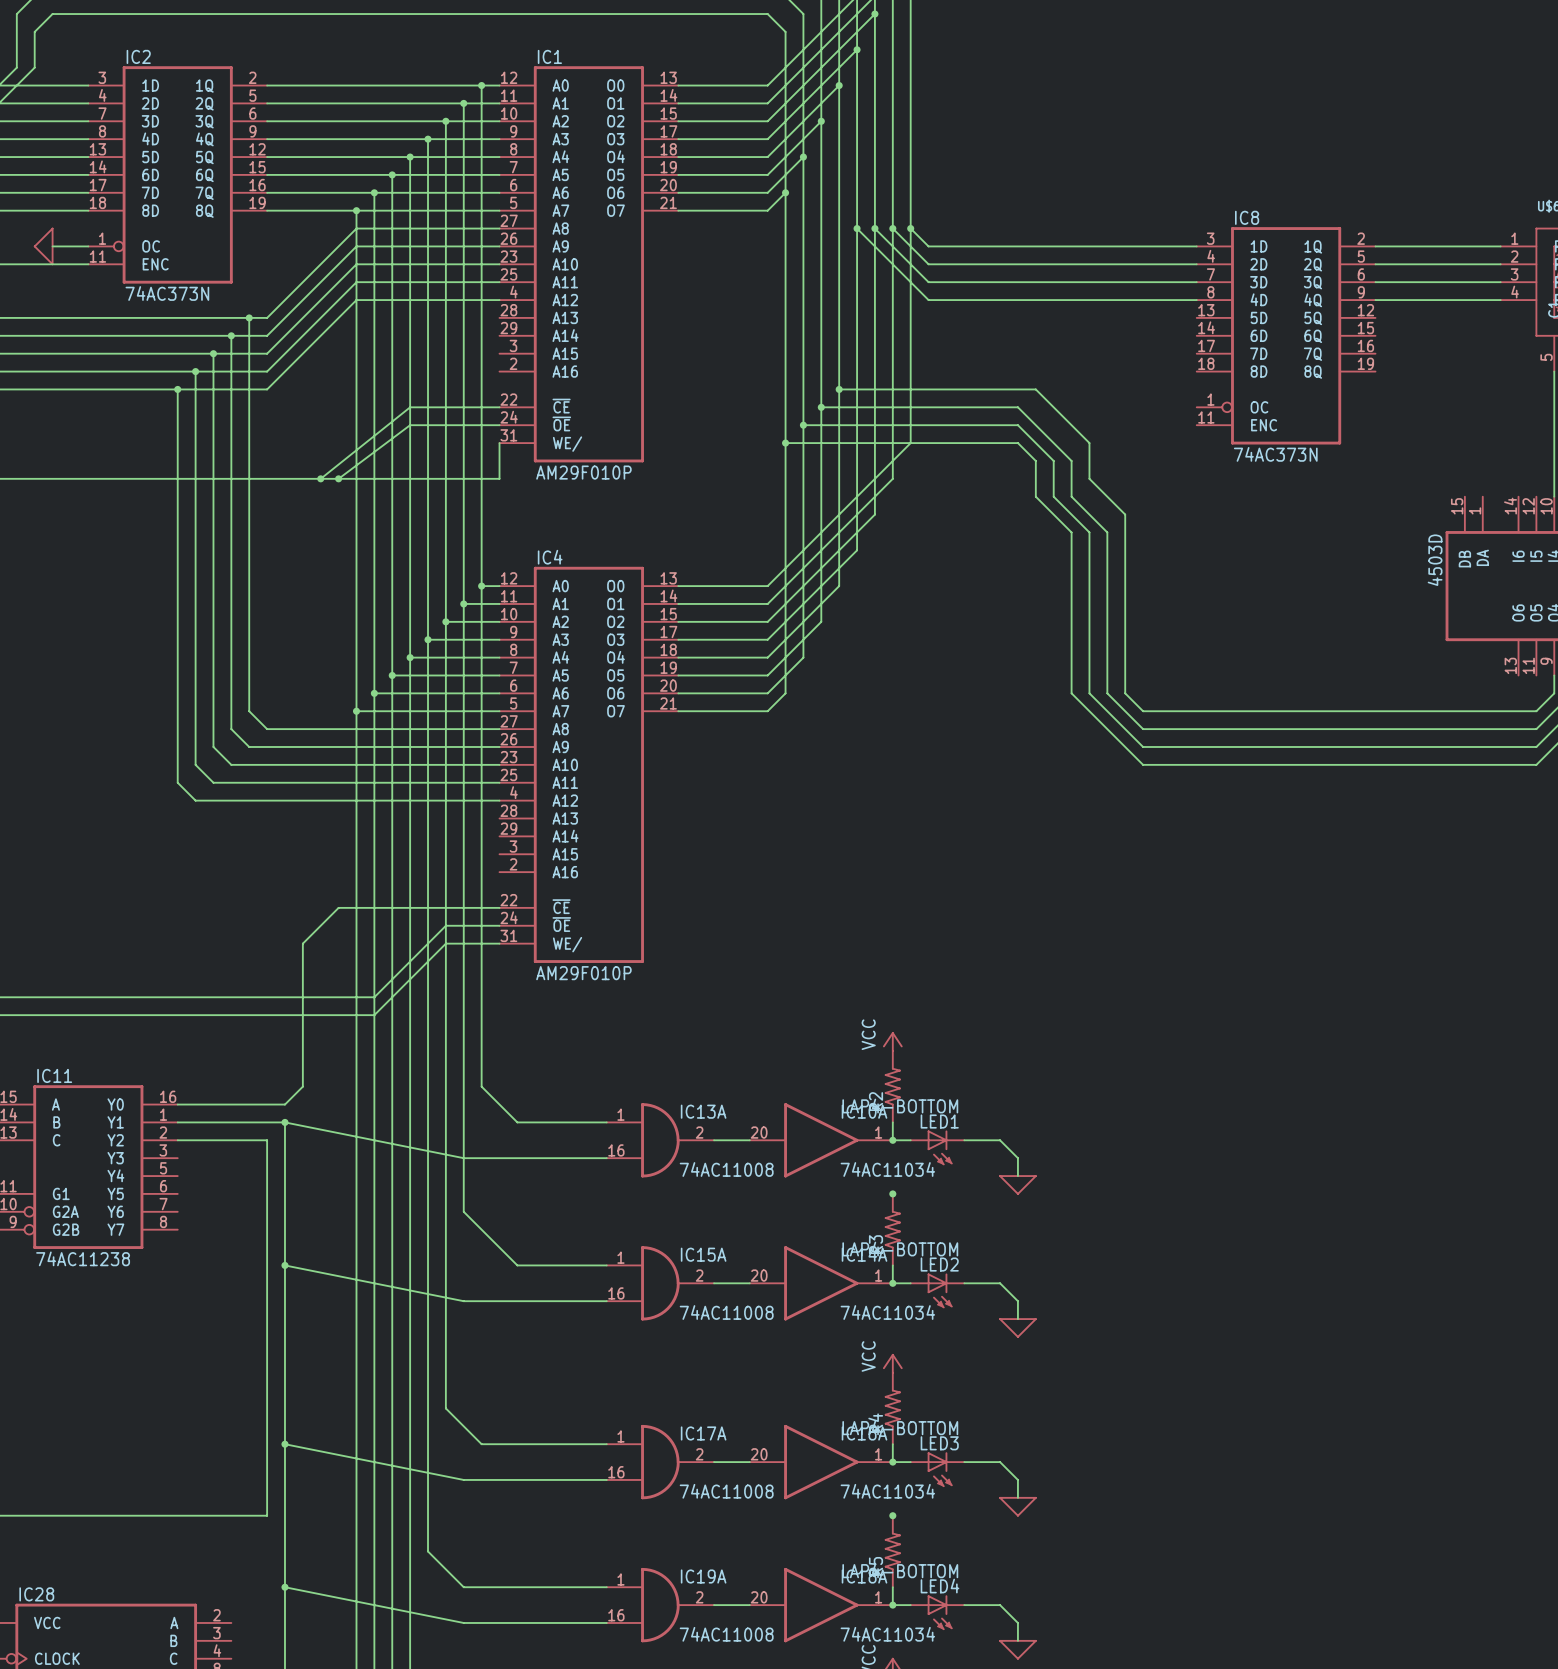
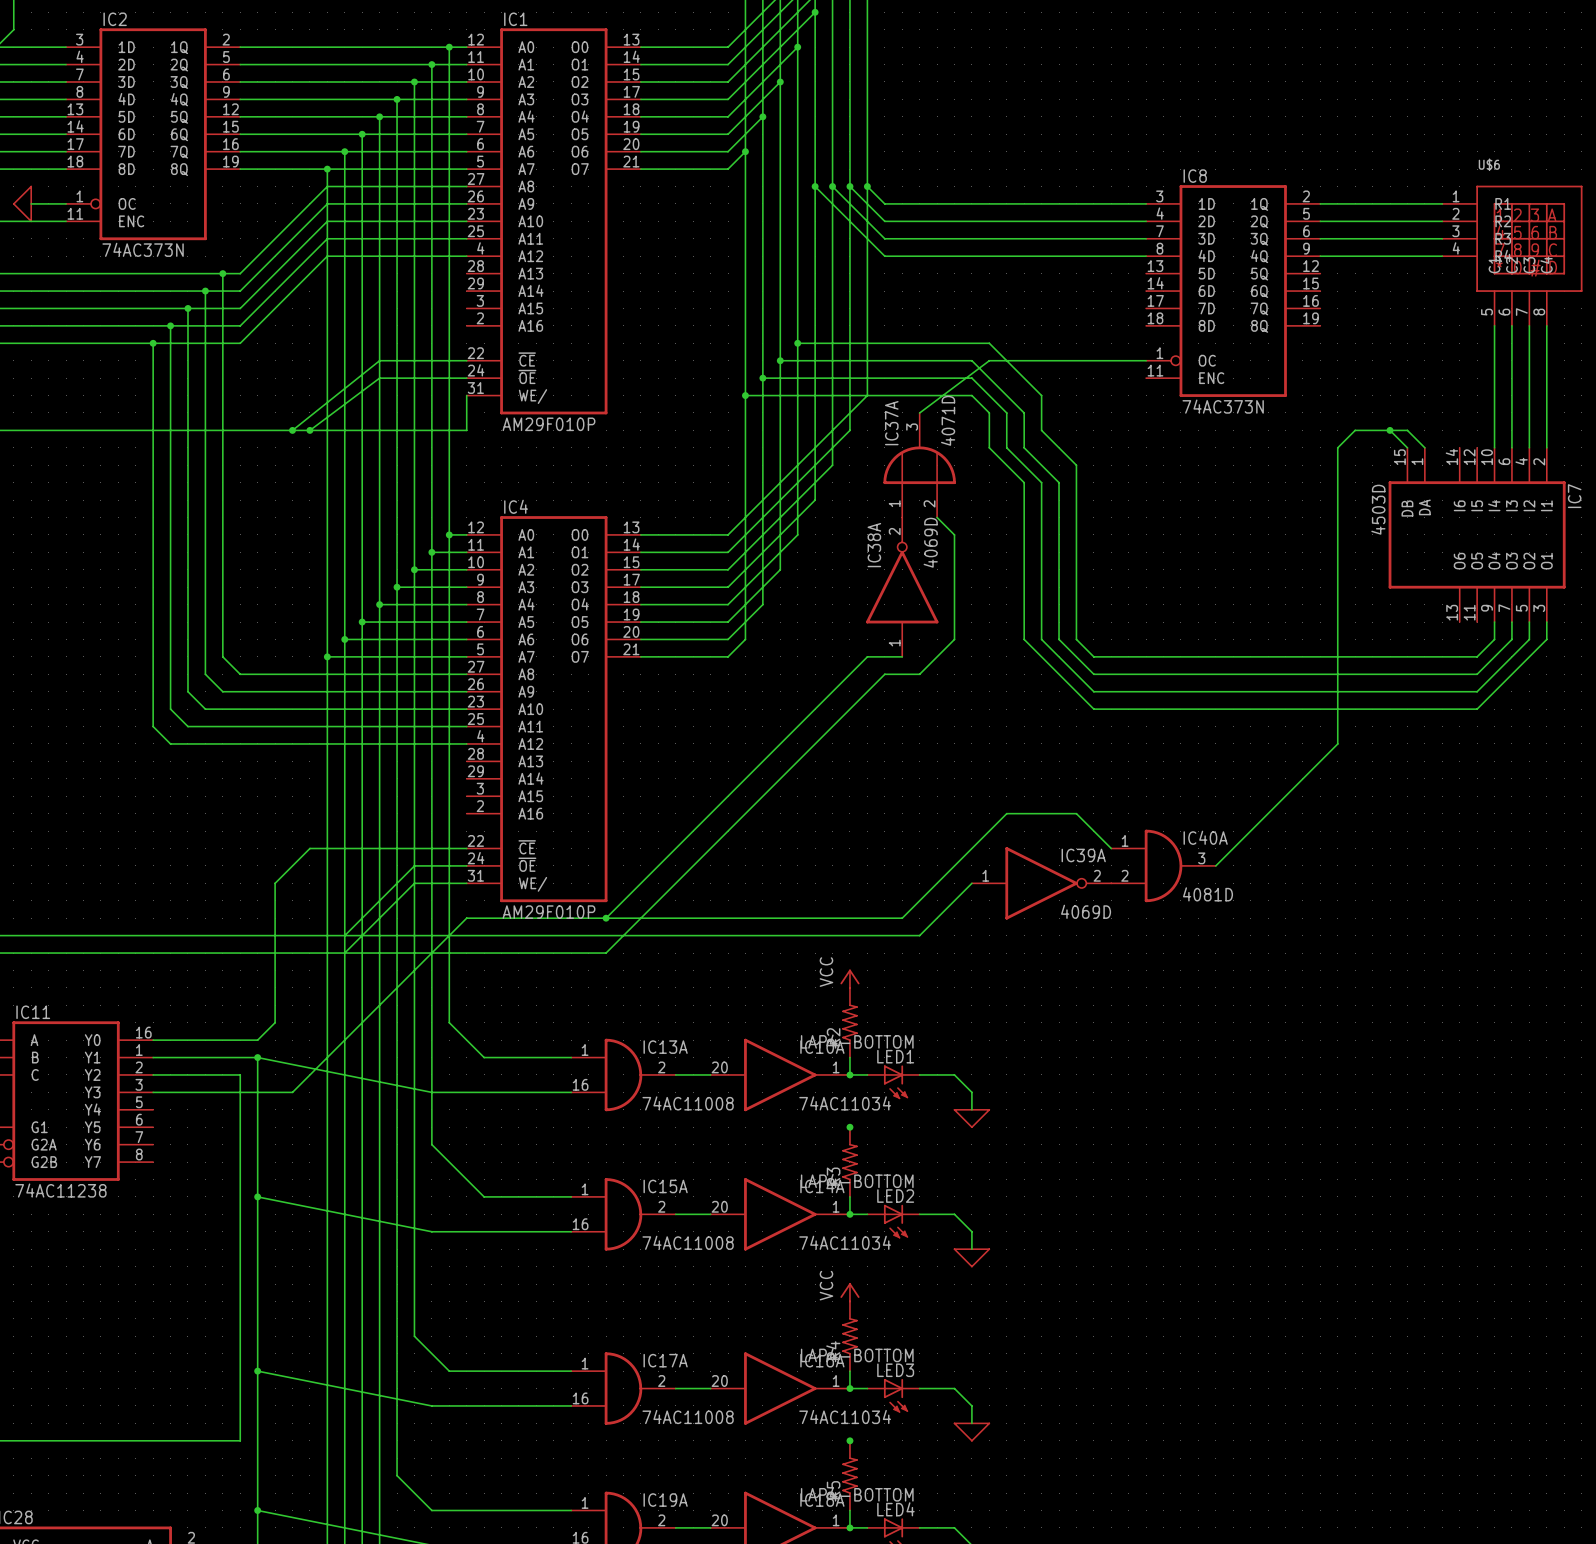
wire: none -> (1146, 360) (989, 360) (919, 412)
wire: none -> (1390, 430) (1407, 447)
junction: none -> (1390, 430)
wire: none -> (1424, 447) (1407, 430) (1355, 430) (1337, 447) (1337, 743) (1215, 865)
IC37A: none -> 4071D (919, 465)
wire: none -> (937, 517) (954, 534) (954, 639) (919, 674) (884, 674) (606, 953) (344, 953)
IC38A: none -> 4069D (902, 587)
wire: none -> (902, 656) (867, 656) (606, 918)
wire: none -> (1111, 848) (1076, 813) (1006, 813) (902, 918) (466, 918) (292, 1092) (153, 1092)
IC40A: none -> 4081D (1163, 865)
wire: none -> (971, 883) (919, 935) (344, 935)
IC39A: none -> 4069D (1041, 883)
junction: none -> (606, 918)

